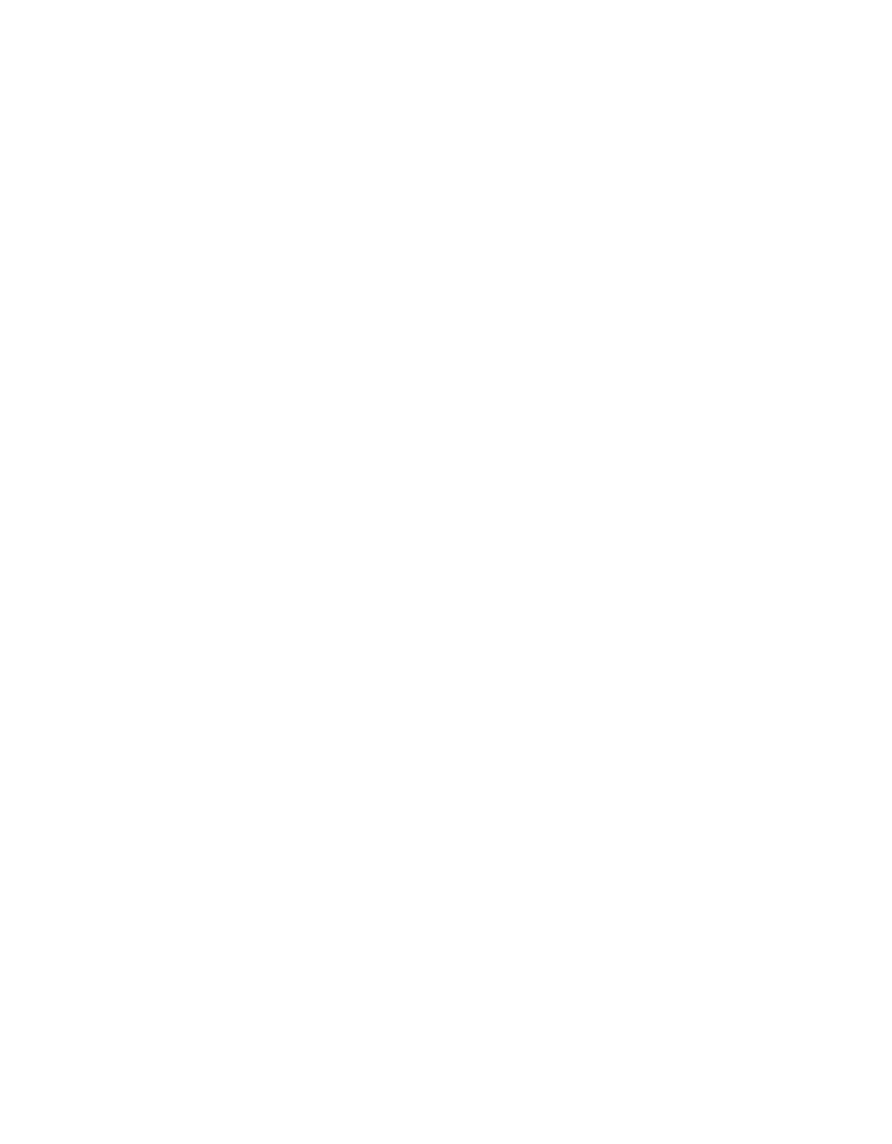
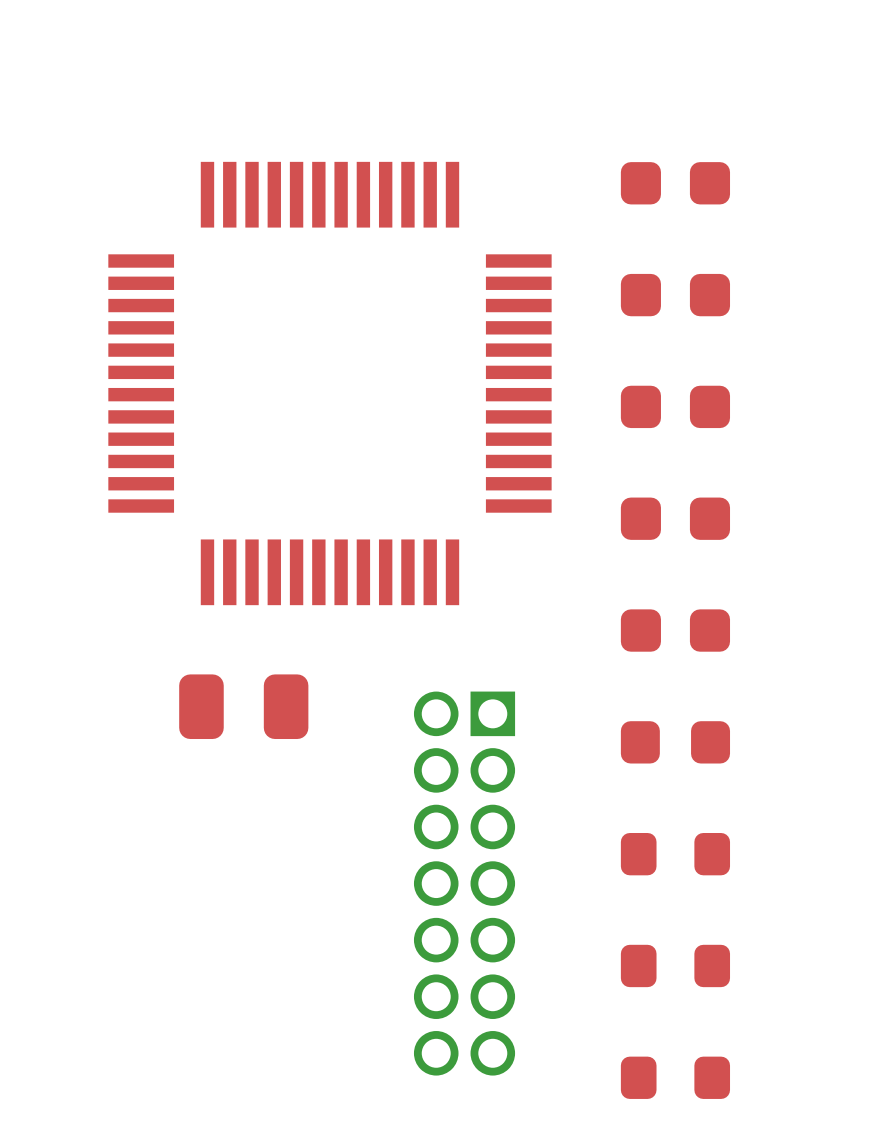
part: none -> (675, 183)
part: none -> (675, 295)
part: none -> (329, 383)
part: none -> (675, 406)
part: none -> (675, 518)
part: none -> (675, 630)
part: none -> (243, 706)
part: none -> (675, 742)
part: none -> (675, 854)
part: none -> (464, 883)
part: none -> (675, 965)
part: none -> (675, 1077)

